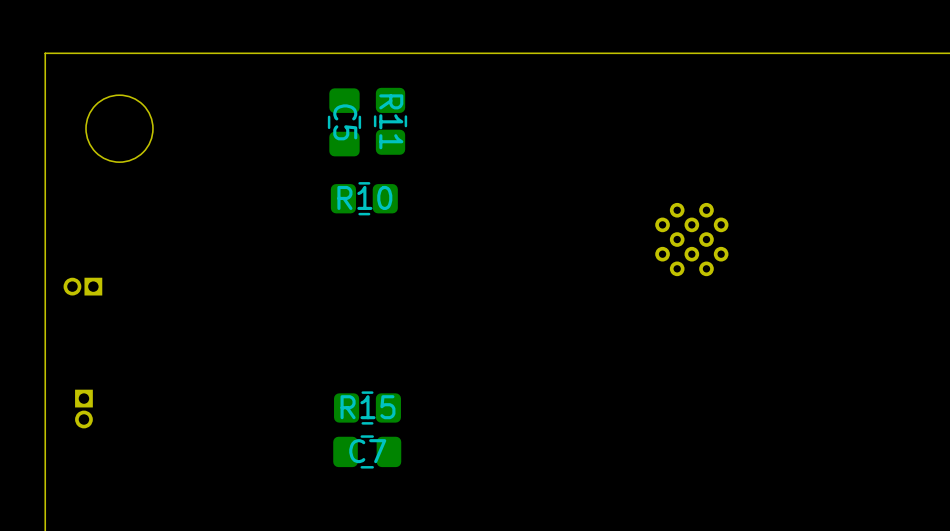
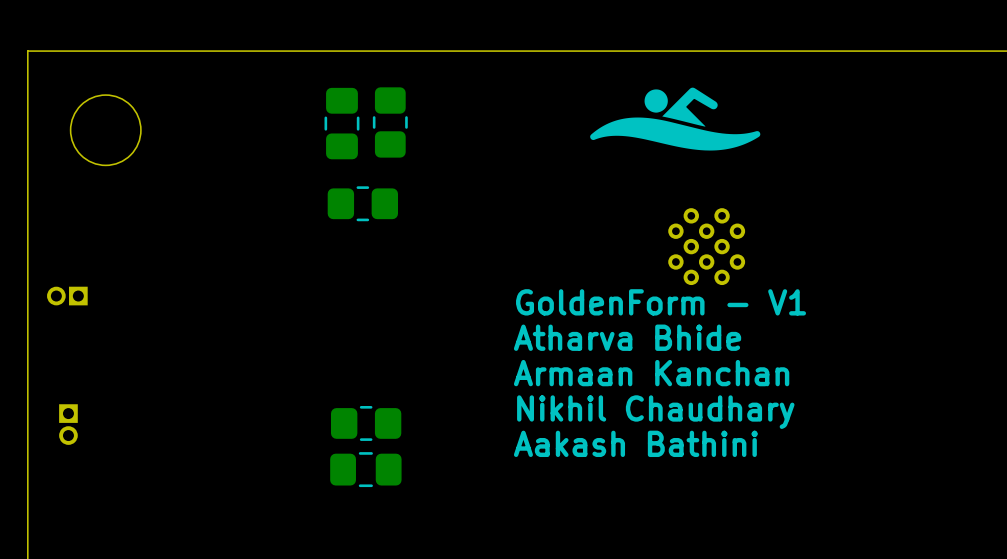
drawing: none -> [590, 87, 761, 151]
R11 name: R11 (391, 121) -> none
C5 name: C5 (345, 122) -> none
R10 name: R10 (364, 197) -> none
text: none -> GoldenForm - V1 (661, 302)
text: none -> Atharva Bhide (627, 337)
text: none -> Armaan Kanchan (651, 373)
text: none -> Nikhil Chaudhary (655, 412)
R15 name: R15 (367, 407) -> none
text: none -> Aakash Bathini (635, 443)
C7 name: C7 (367, 451) -> none

